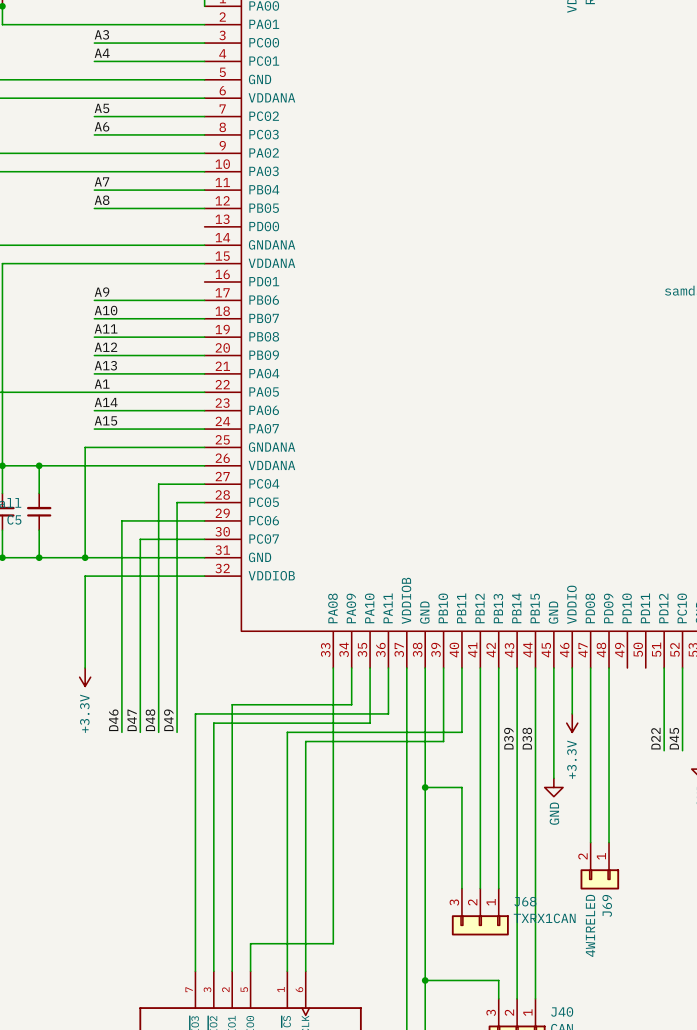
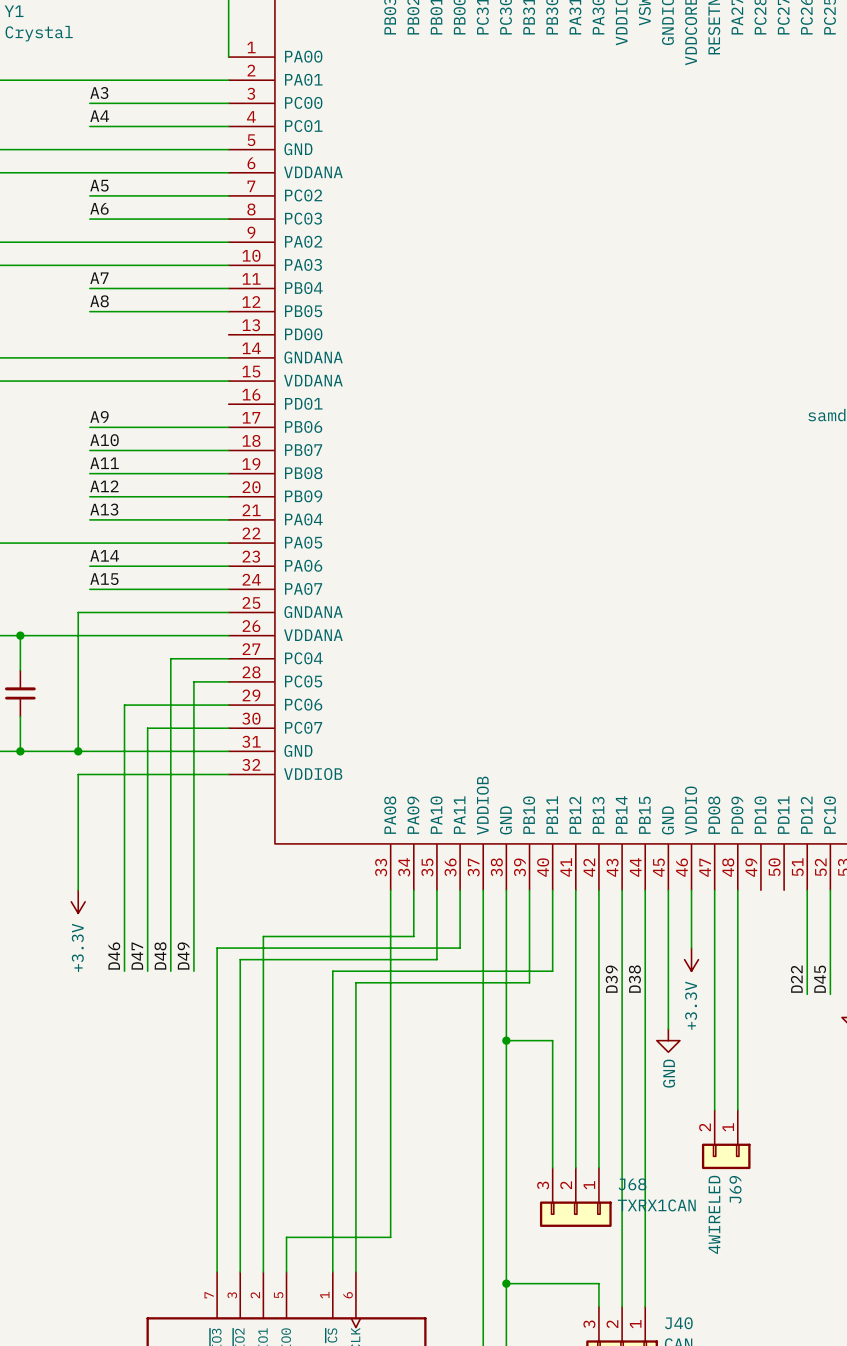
label: A1 (102, 384) -> none

